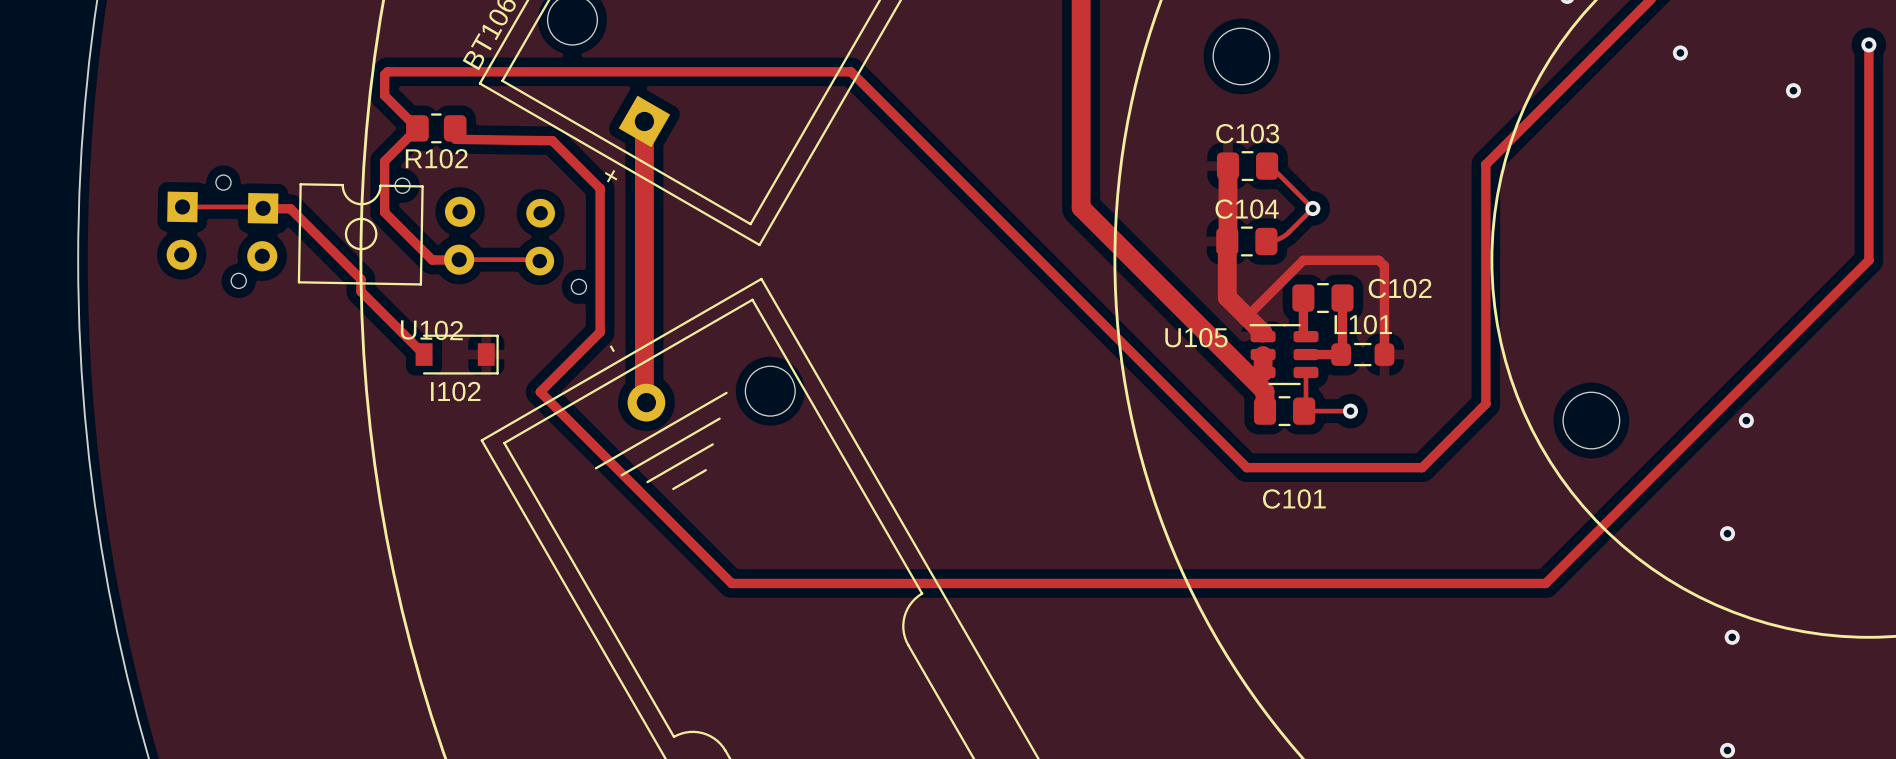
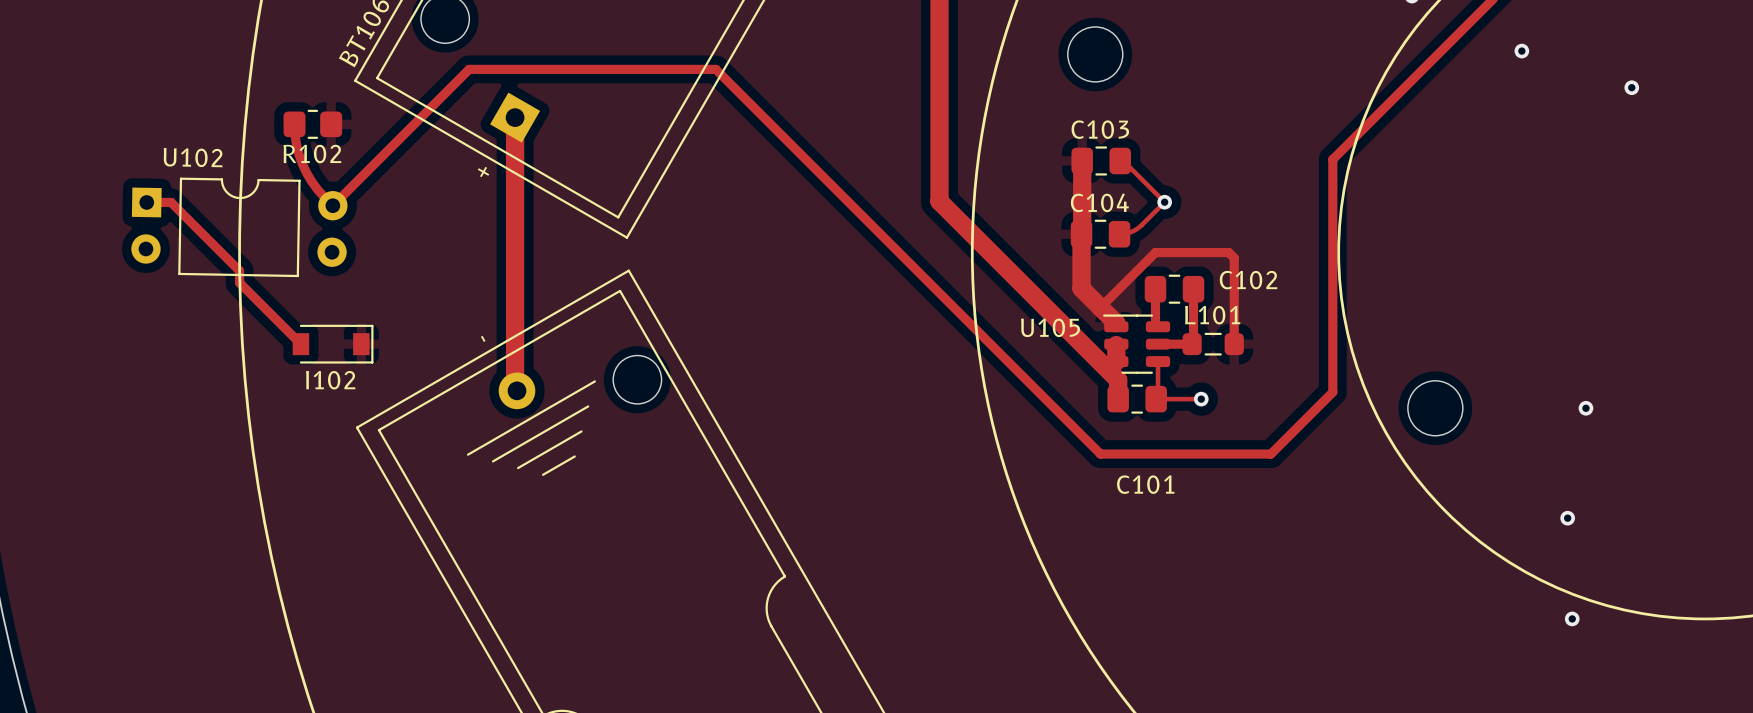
track: (1868, 44) (1868, 260) (1545, 583) (731, 583) (540, 391) (600, 332) (600, 188) (552, 140) (455, 139) -> none
via: (1868, 44) -> none
track: (597, 71) (387, 71) (384, 74) (384, 95) (417, 128) (384, 161) (384, 212) (432, 259) (456, 259) -> (469, 69) (332, 205) (312, 182) (302, 164) (296, 144) (294, 124)
U102 footprint: [166, 175, 587, 295] -> [131, 177, 348, 278]
track: (182, 206) (263, 208) -> none
track: (459, 259) (539, 261) -> none
U102 name position: U102 (431, 330) -> U102 (193, 157)

